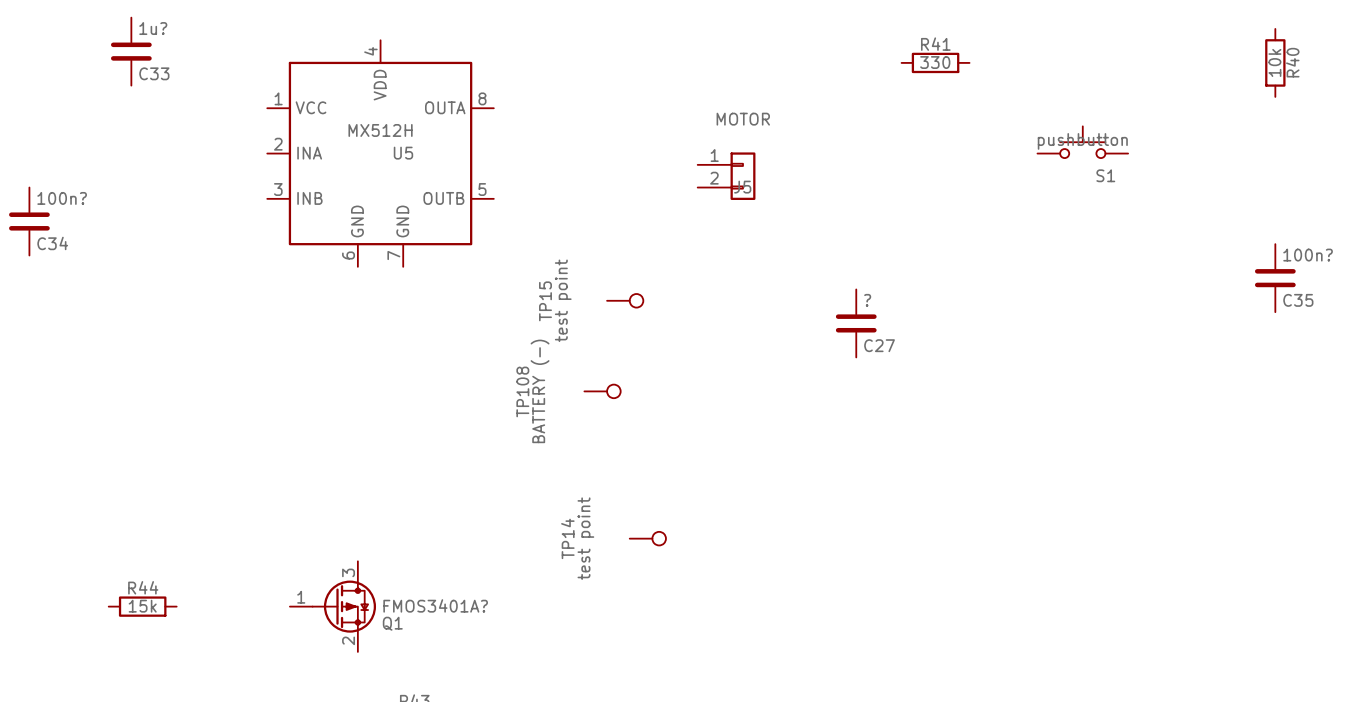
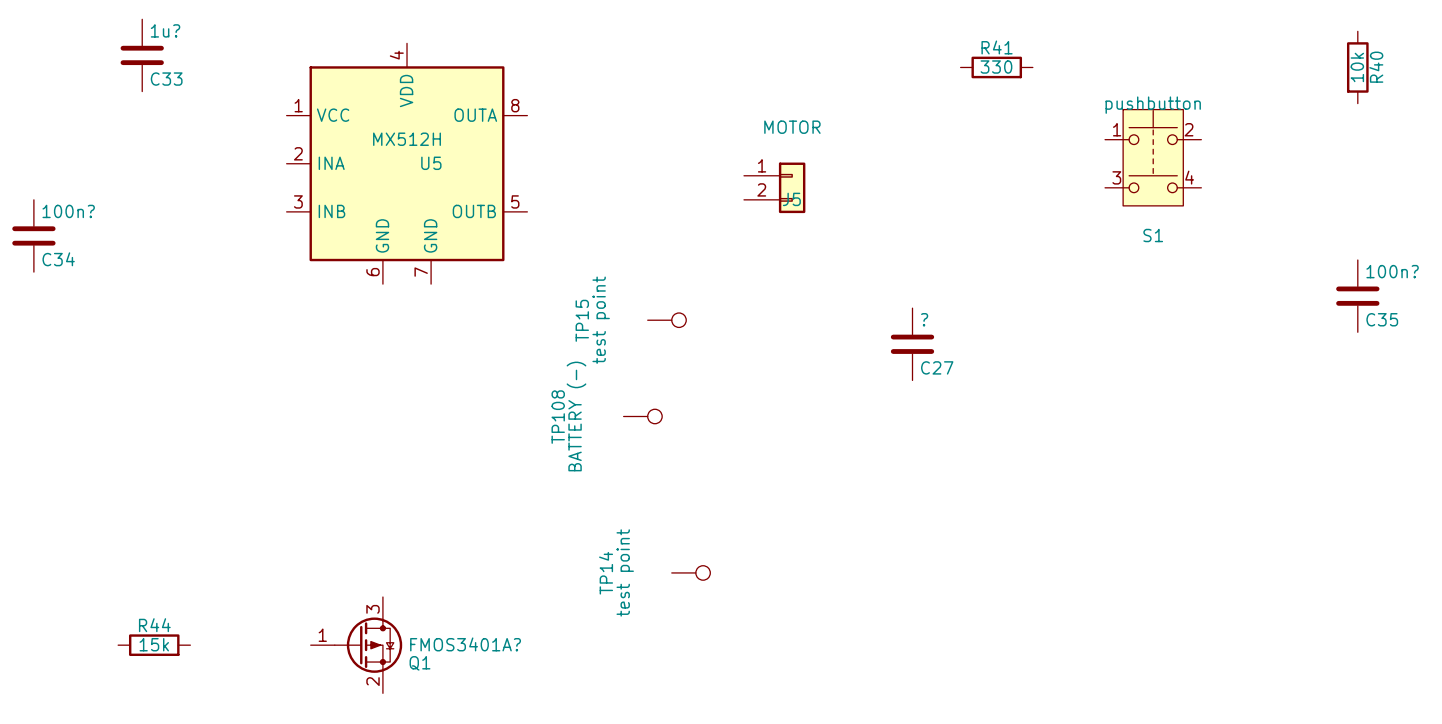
S1 symbol: [1037, 126, 1129, 159] -> [1105, 109, 1202, 206]
S1 value position: pushbutton (1082, 141) -> pushbutton (1153, 105)
S1 name position: S1 (1105, 175) -> S1 (1153, 235)

